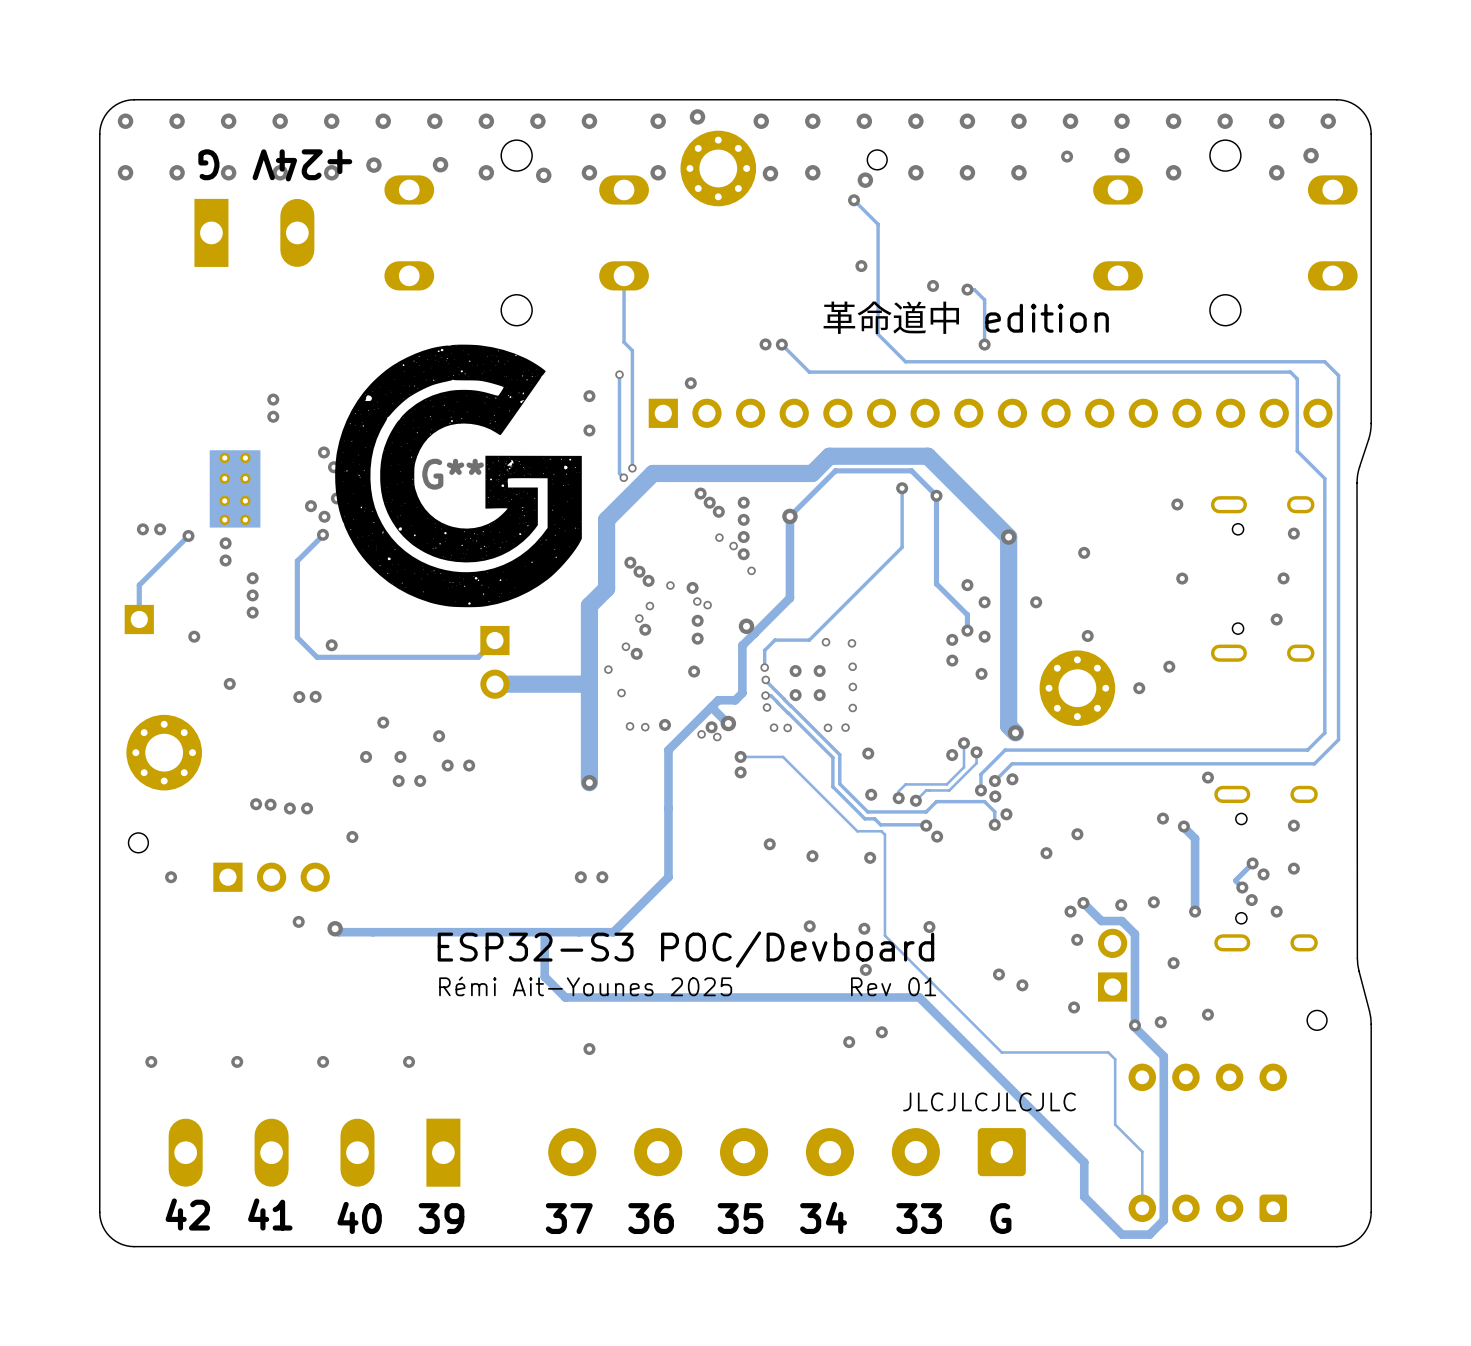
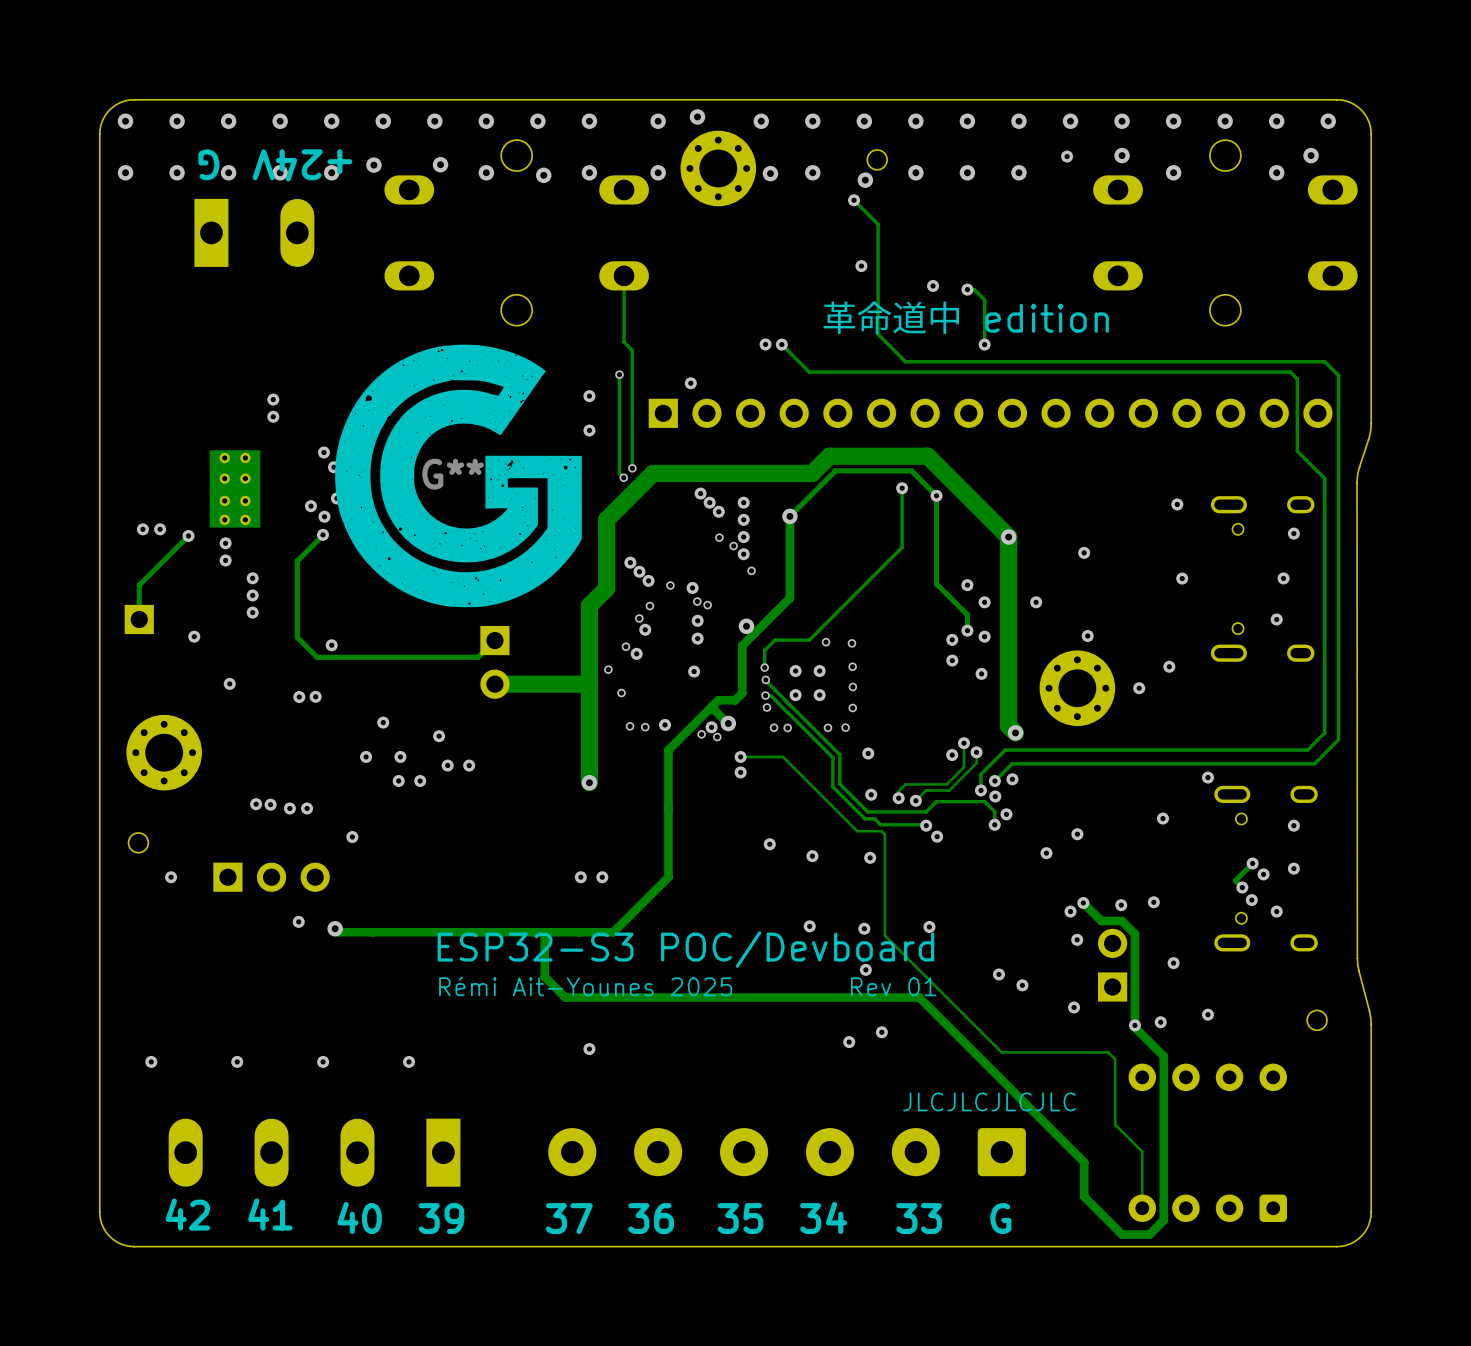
track: (1183, 826) (1195, 838) (1195, 911) -> none
via: (1183, 826) -> none
via: (1195, 911) -> none

